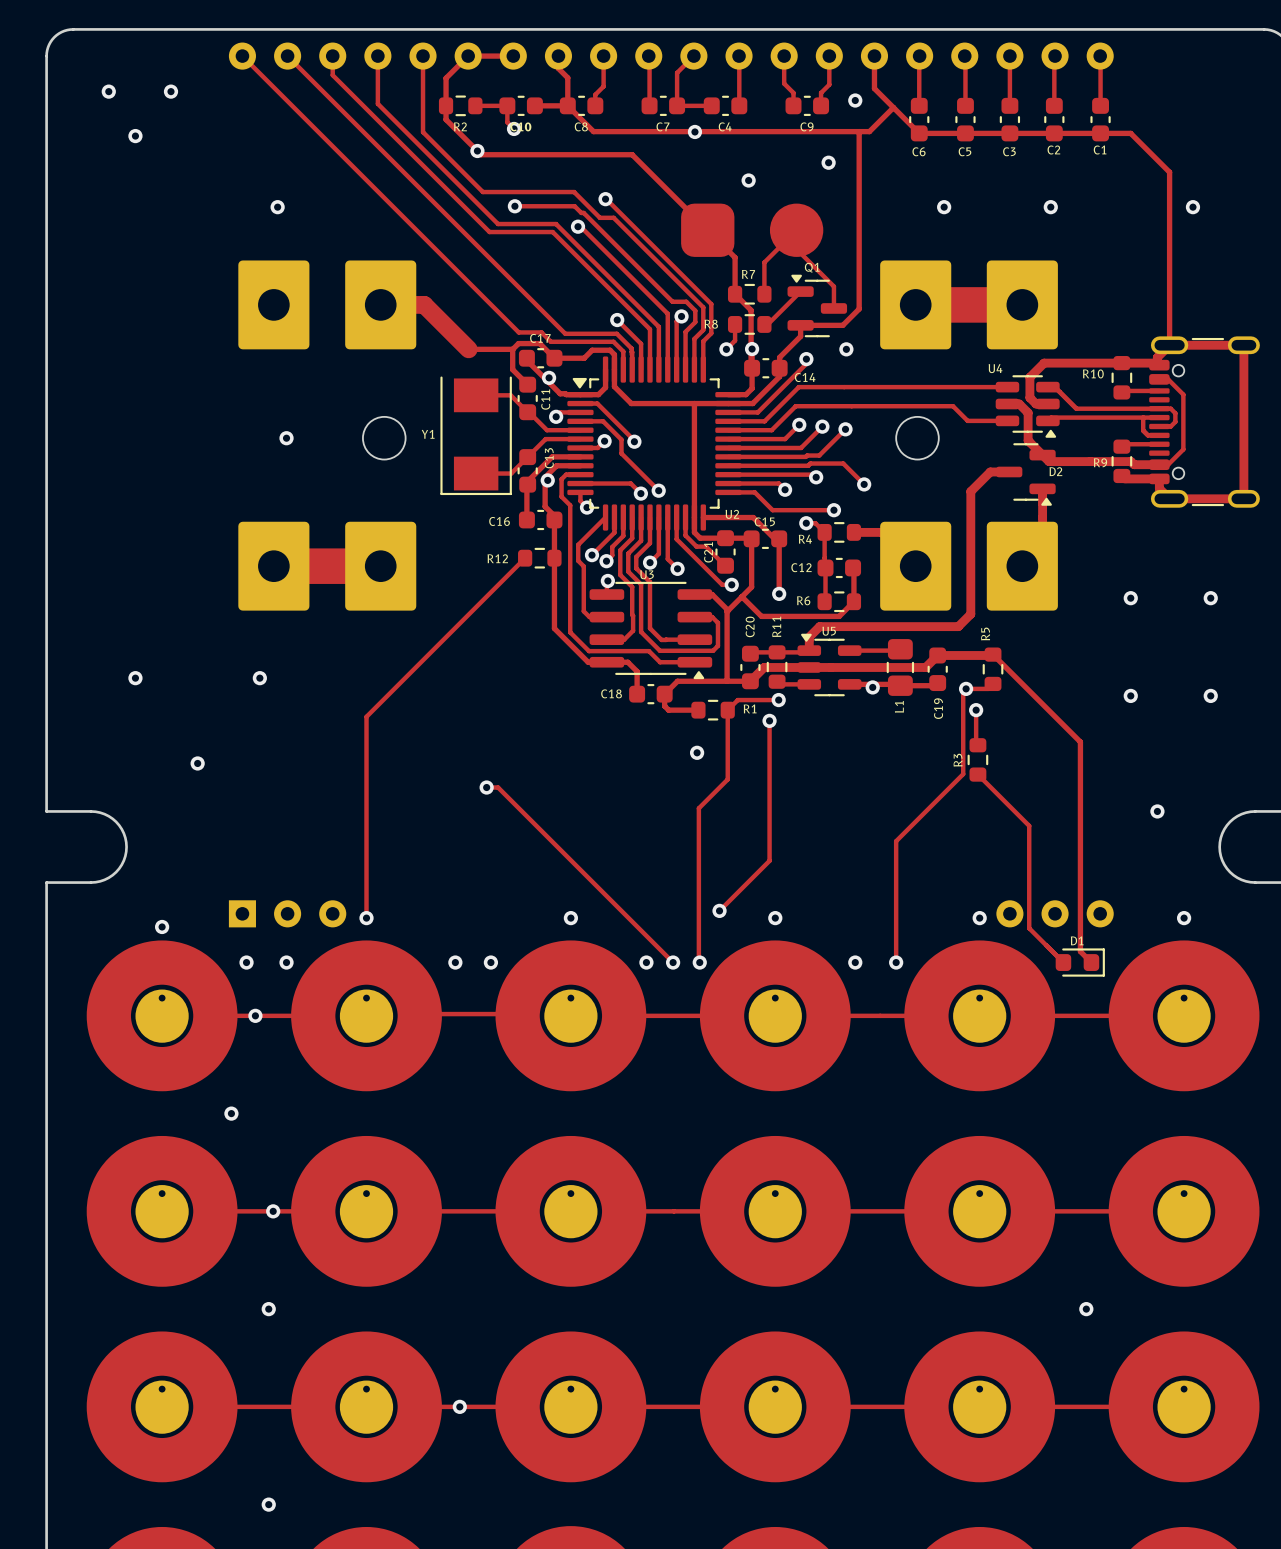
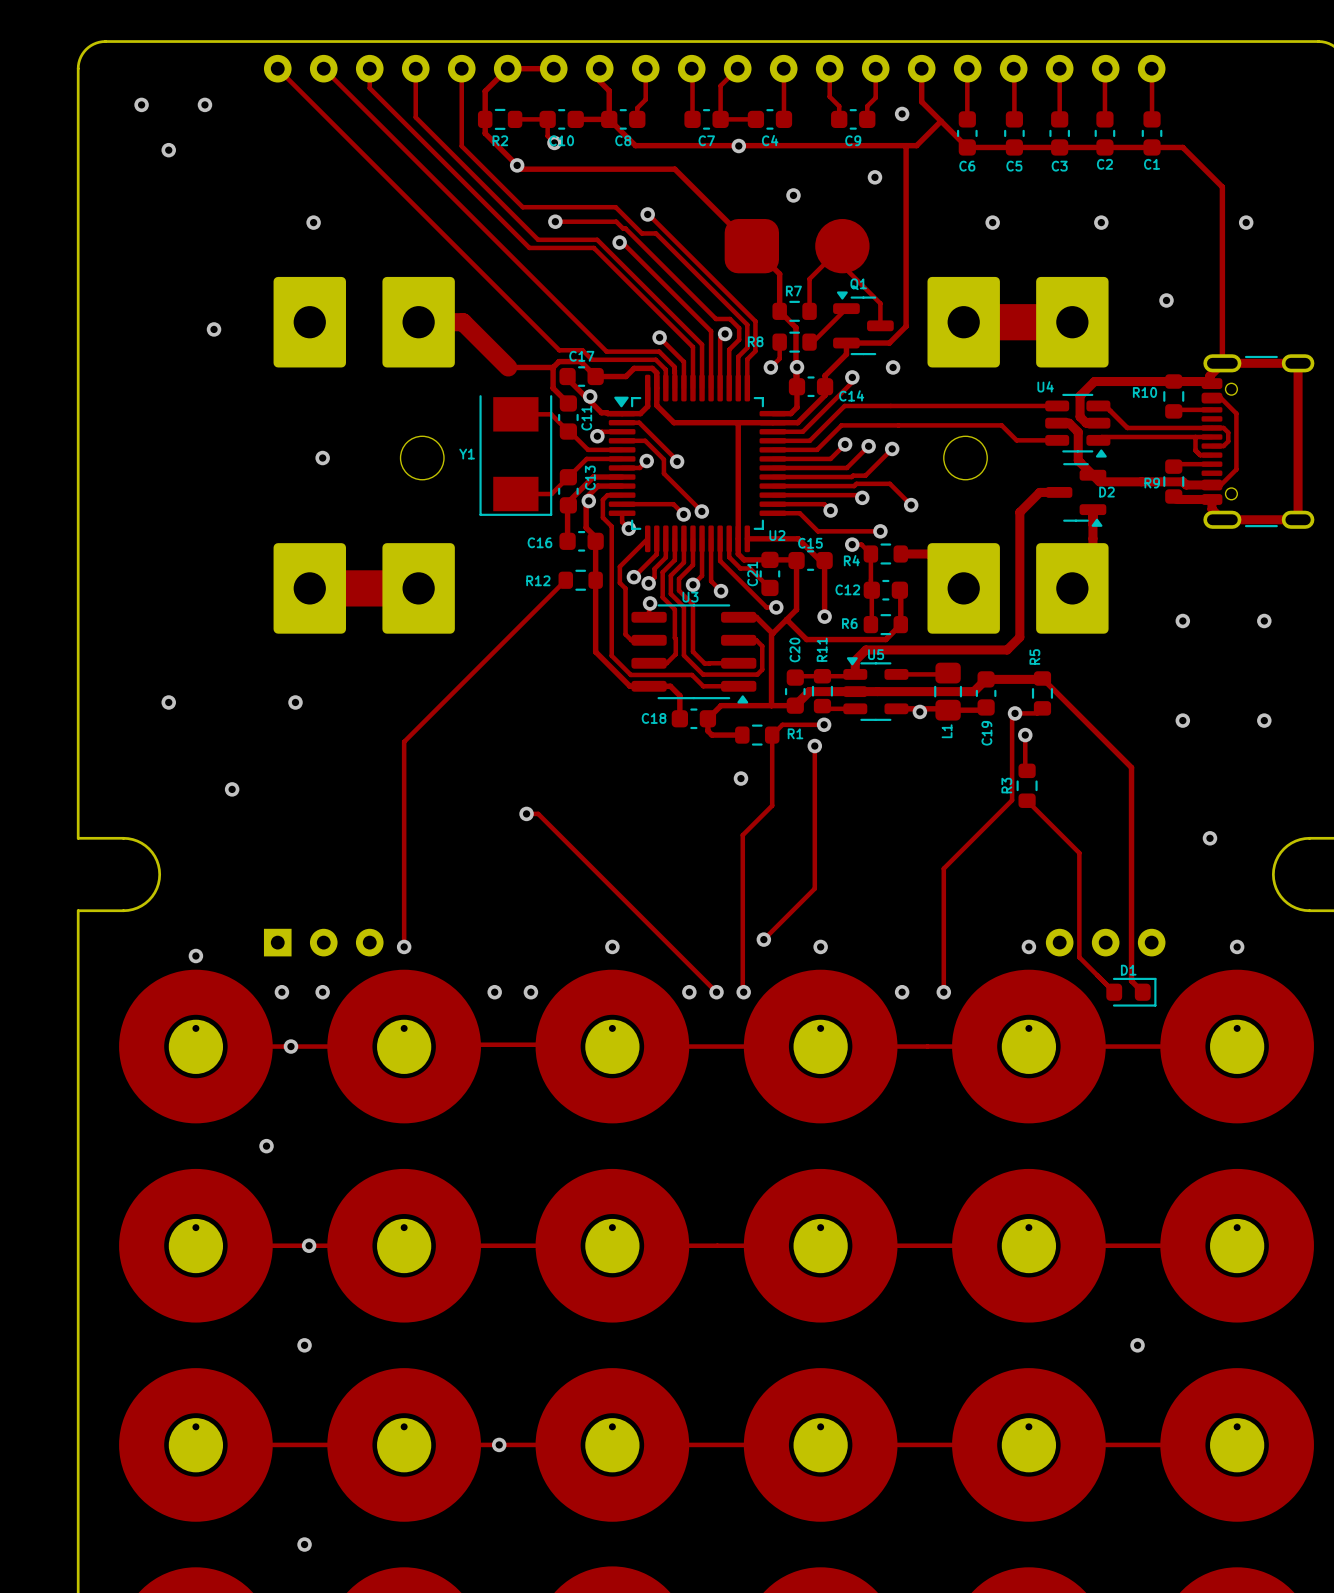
via: none -> (1166, 300)
via: none -> (214, 329)

